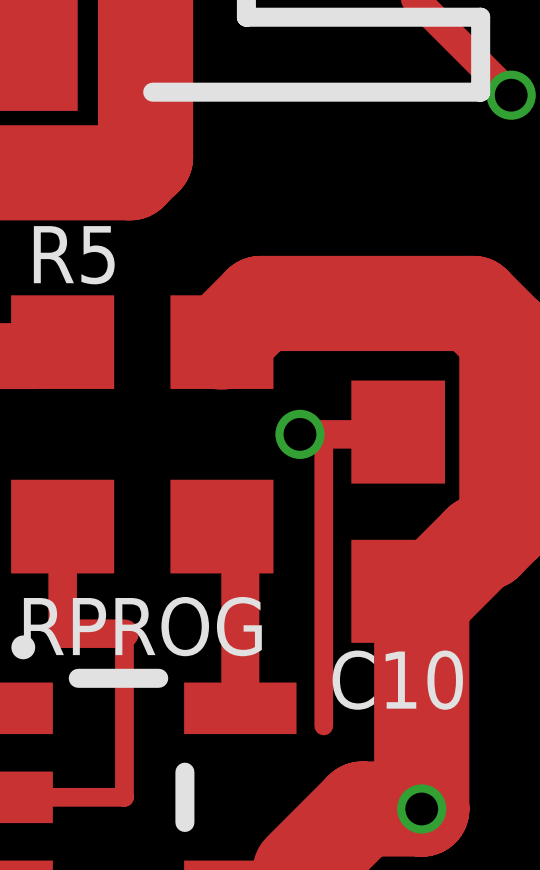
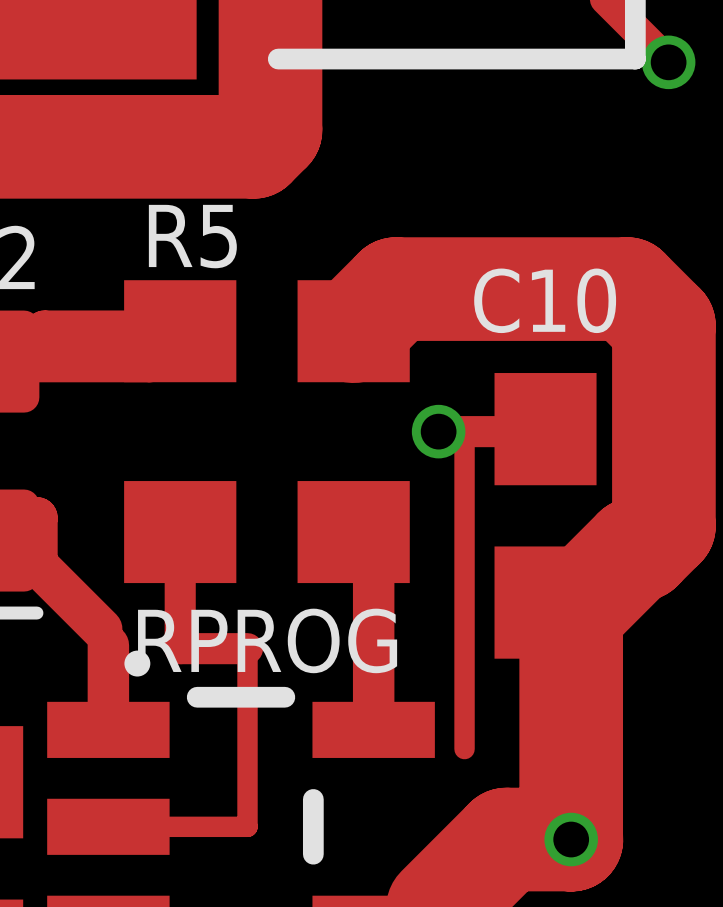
C10 name position: C10 (397, 680) -> C10 (545, 300)

